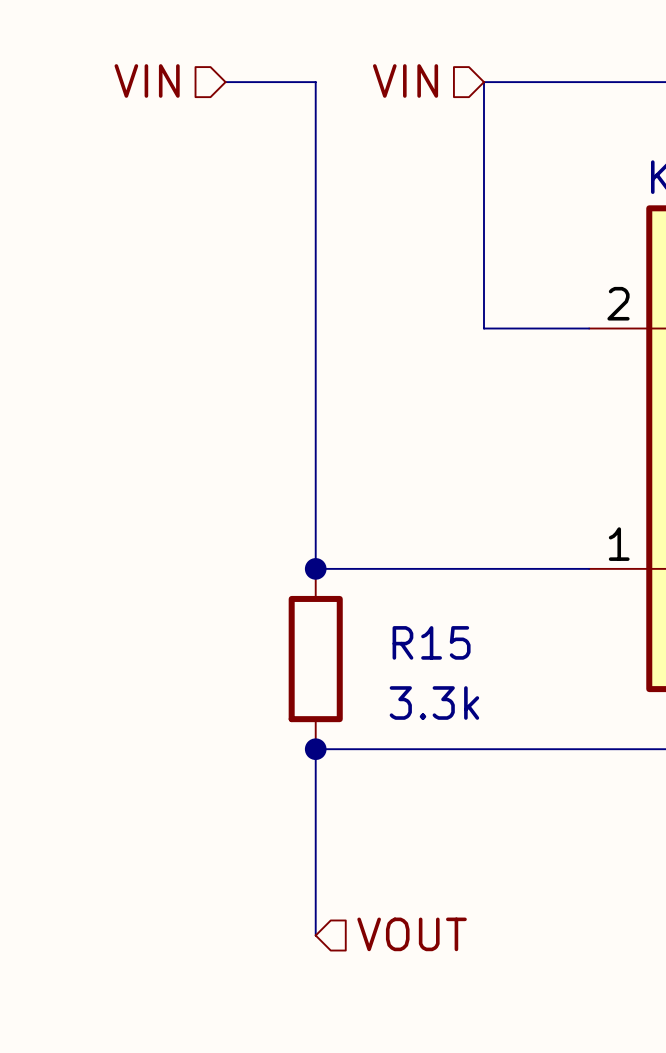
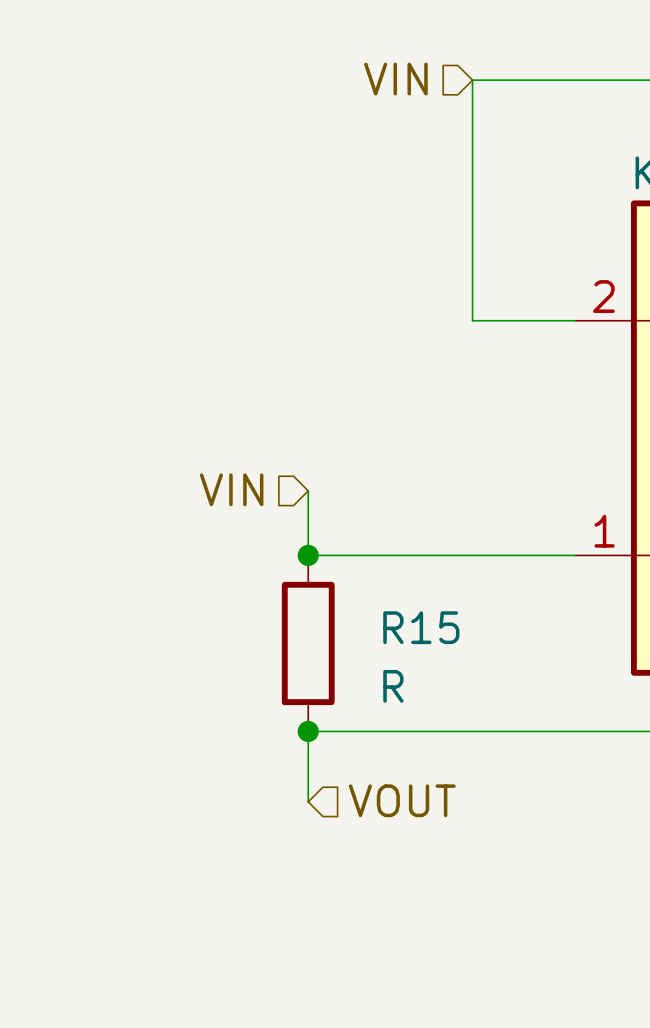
hierarchical label position: VIN (147, 80) -> VIN (231, 489)
wire: (225, 82) (315, 82) (315, 502) -> none
R15 value: 3.3k (434, 703) -> R (393, 686)
wire: (315, 821) (315, 935) -> none
hierarchical label position: VOUT (412, 934) -> VOUT (402, 800)

